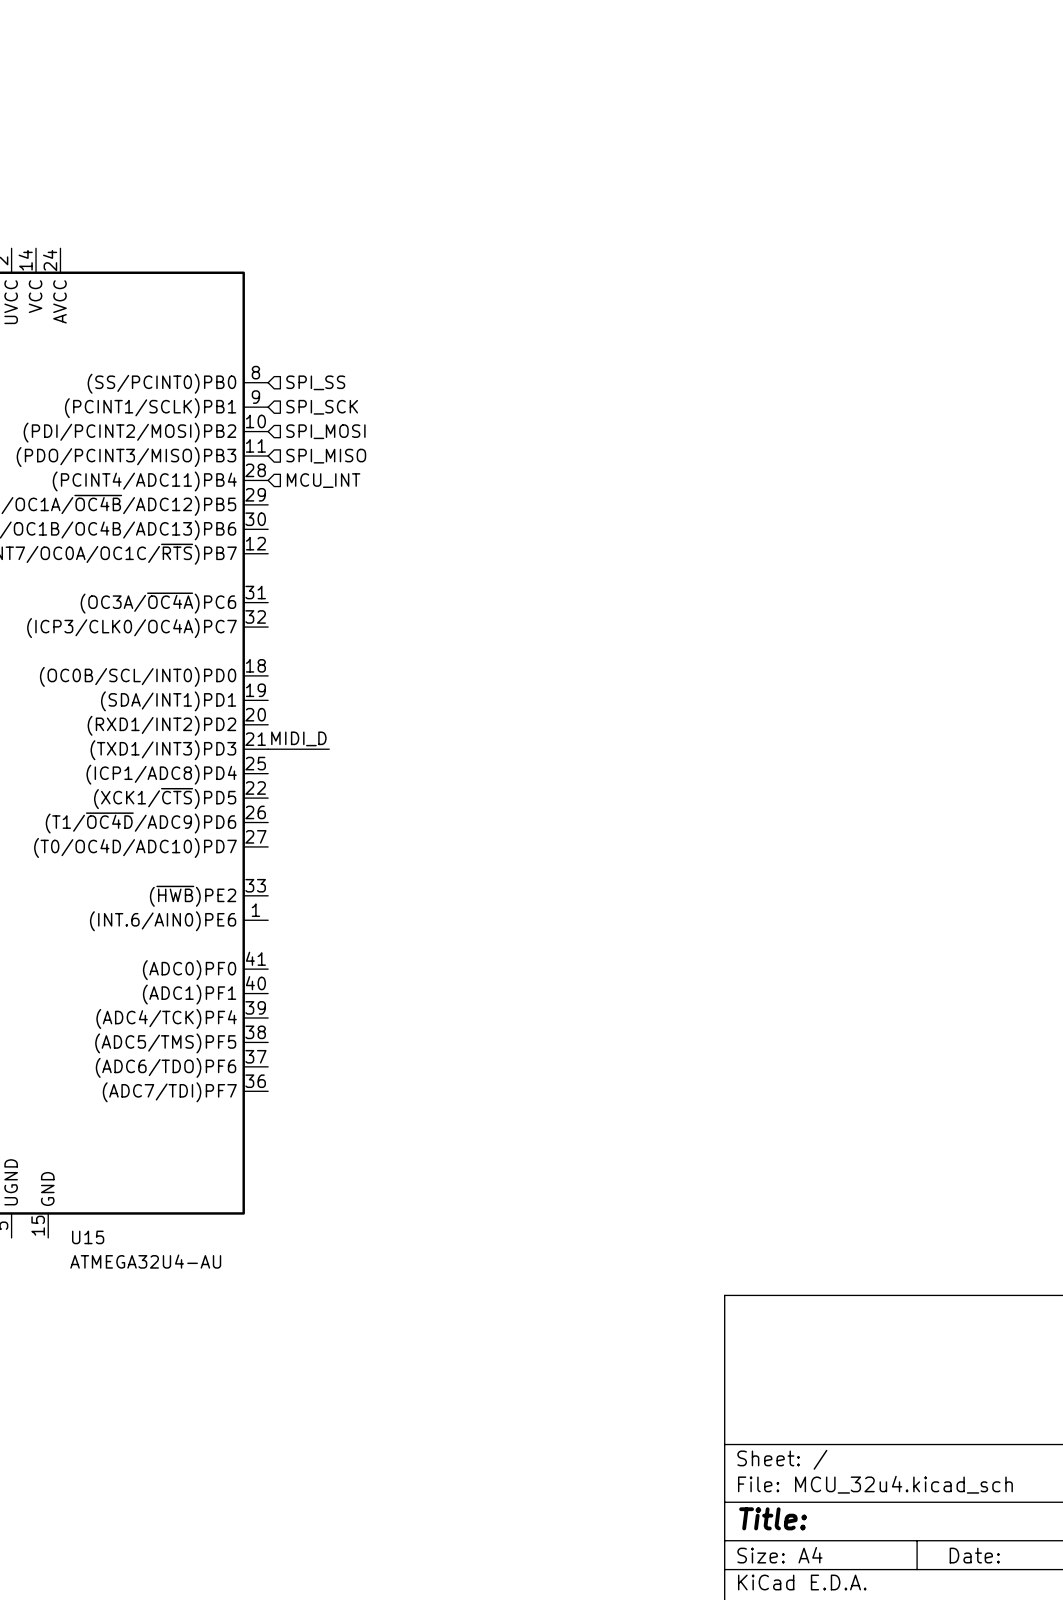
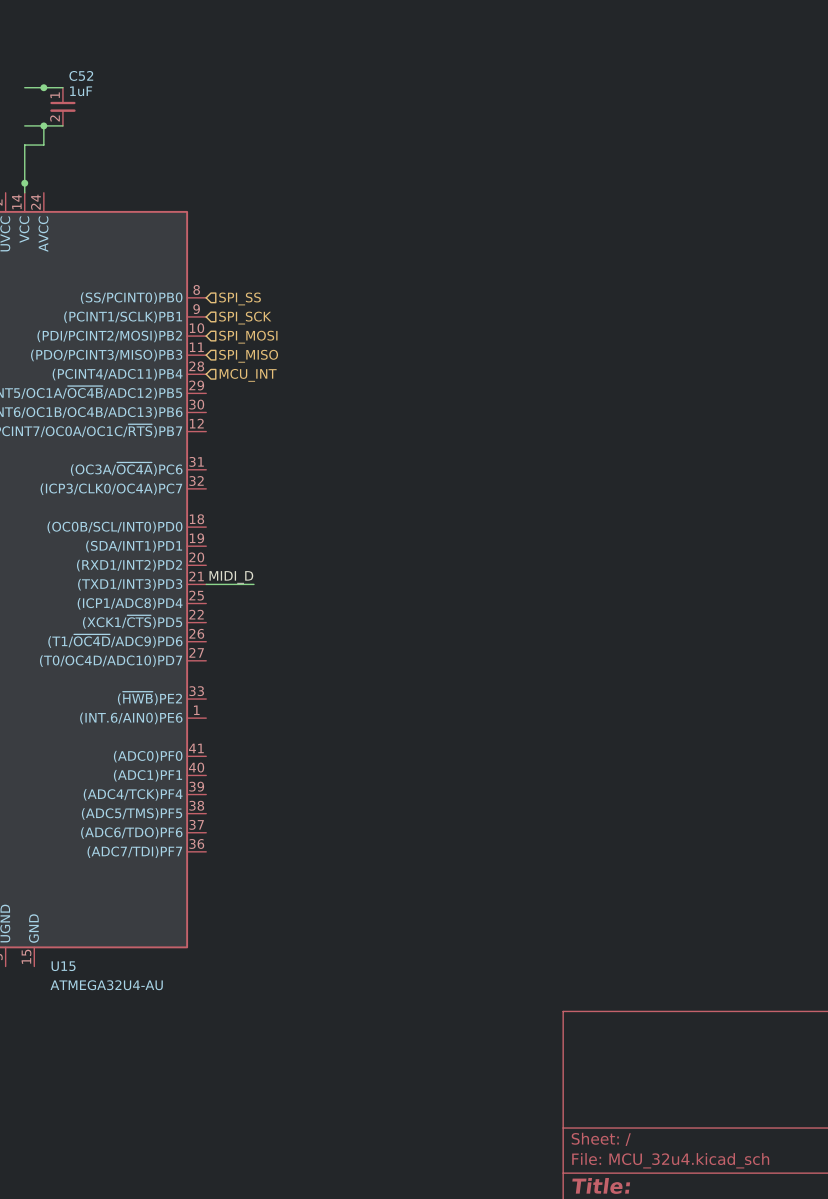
wire: none -> (24, 87) (62, 87)
junction: none -> (43, 87)
C52: none -> 1uF (62, 106)
wire: none -> (24, 125) (62, 125)
wire: none -> (43, 125) (43, 145) (24, 145) (24, 192)
junction: none -> (43, 125)
junction: none -> (24, 183)

